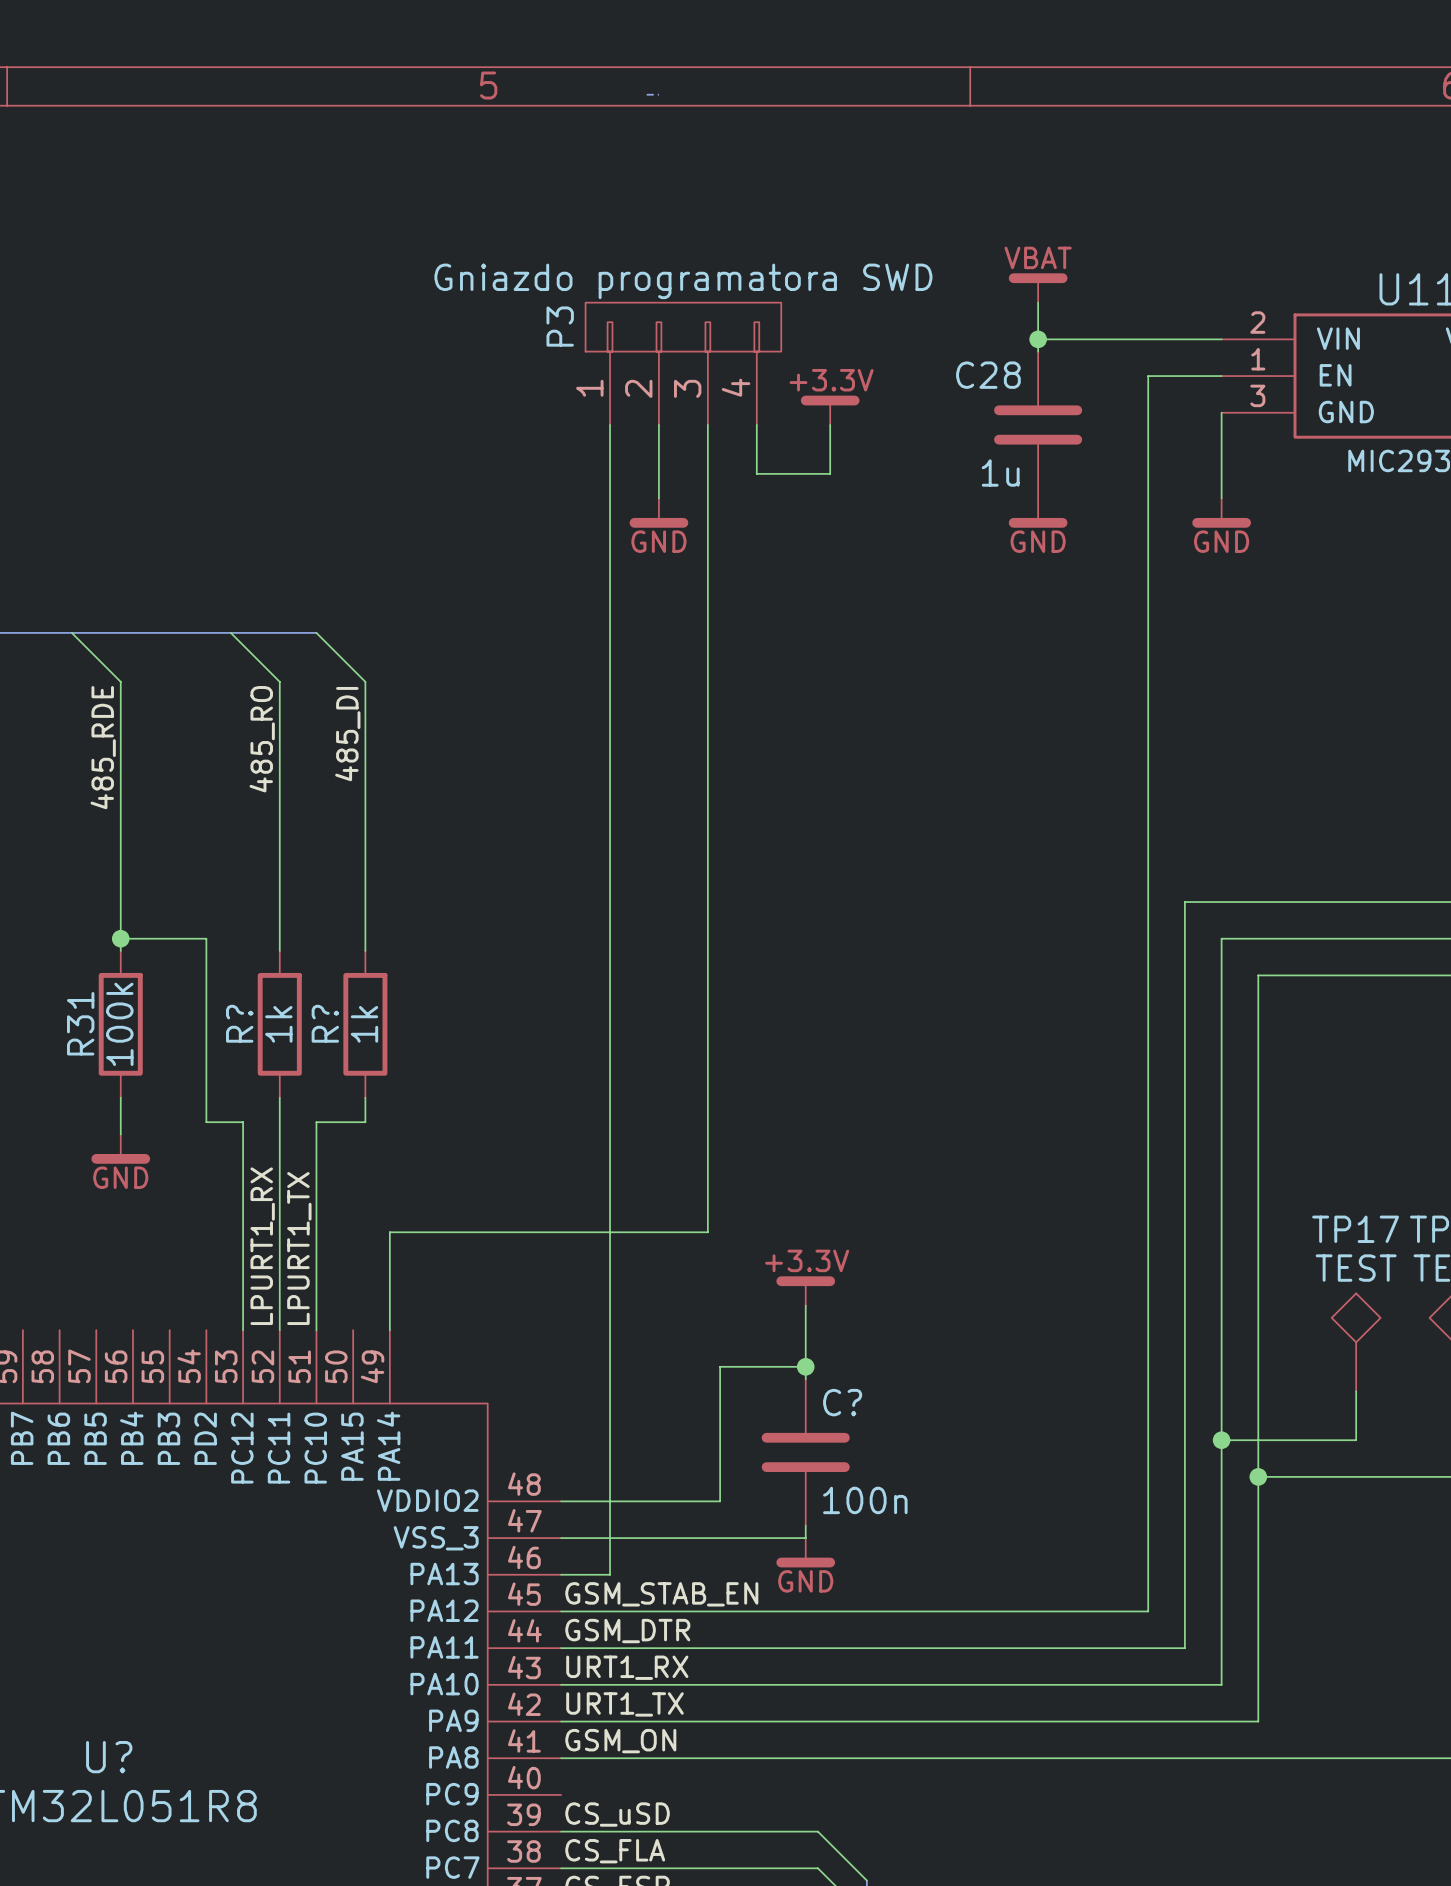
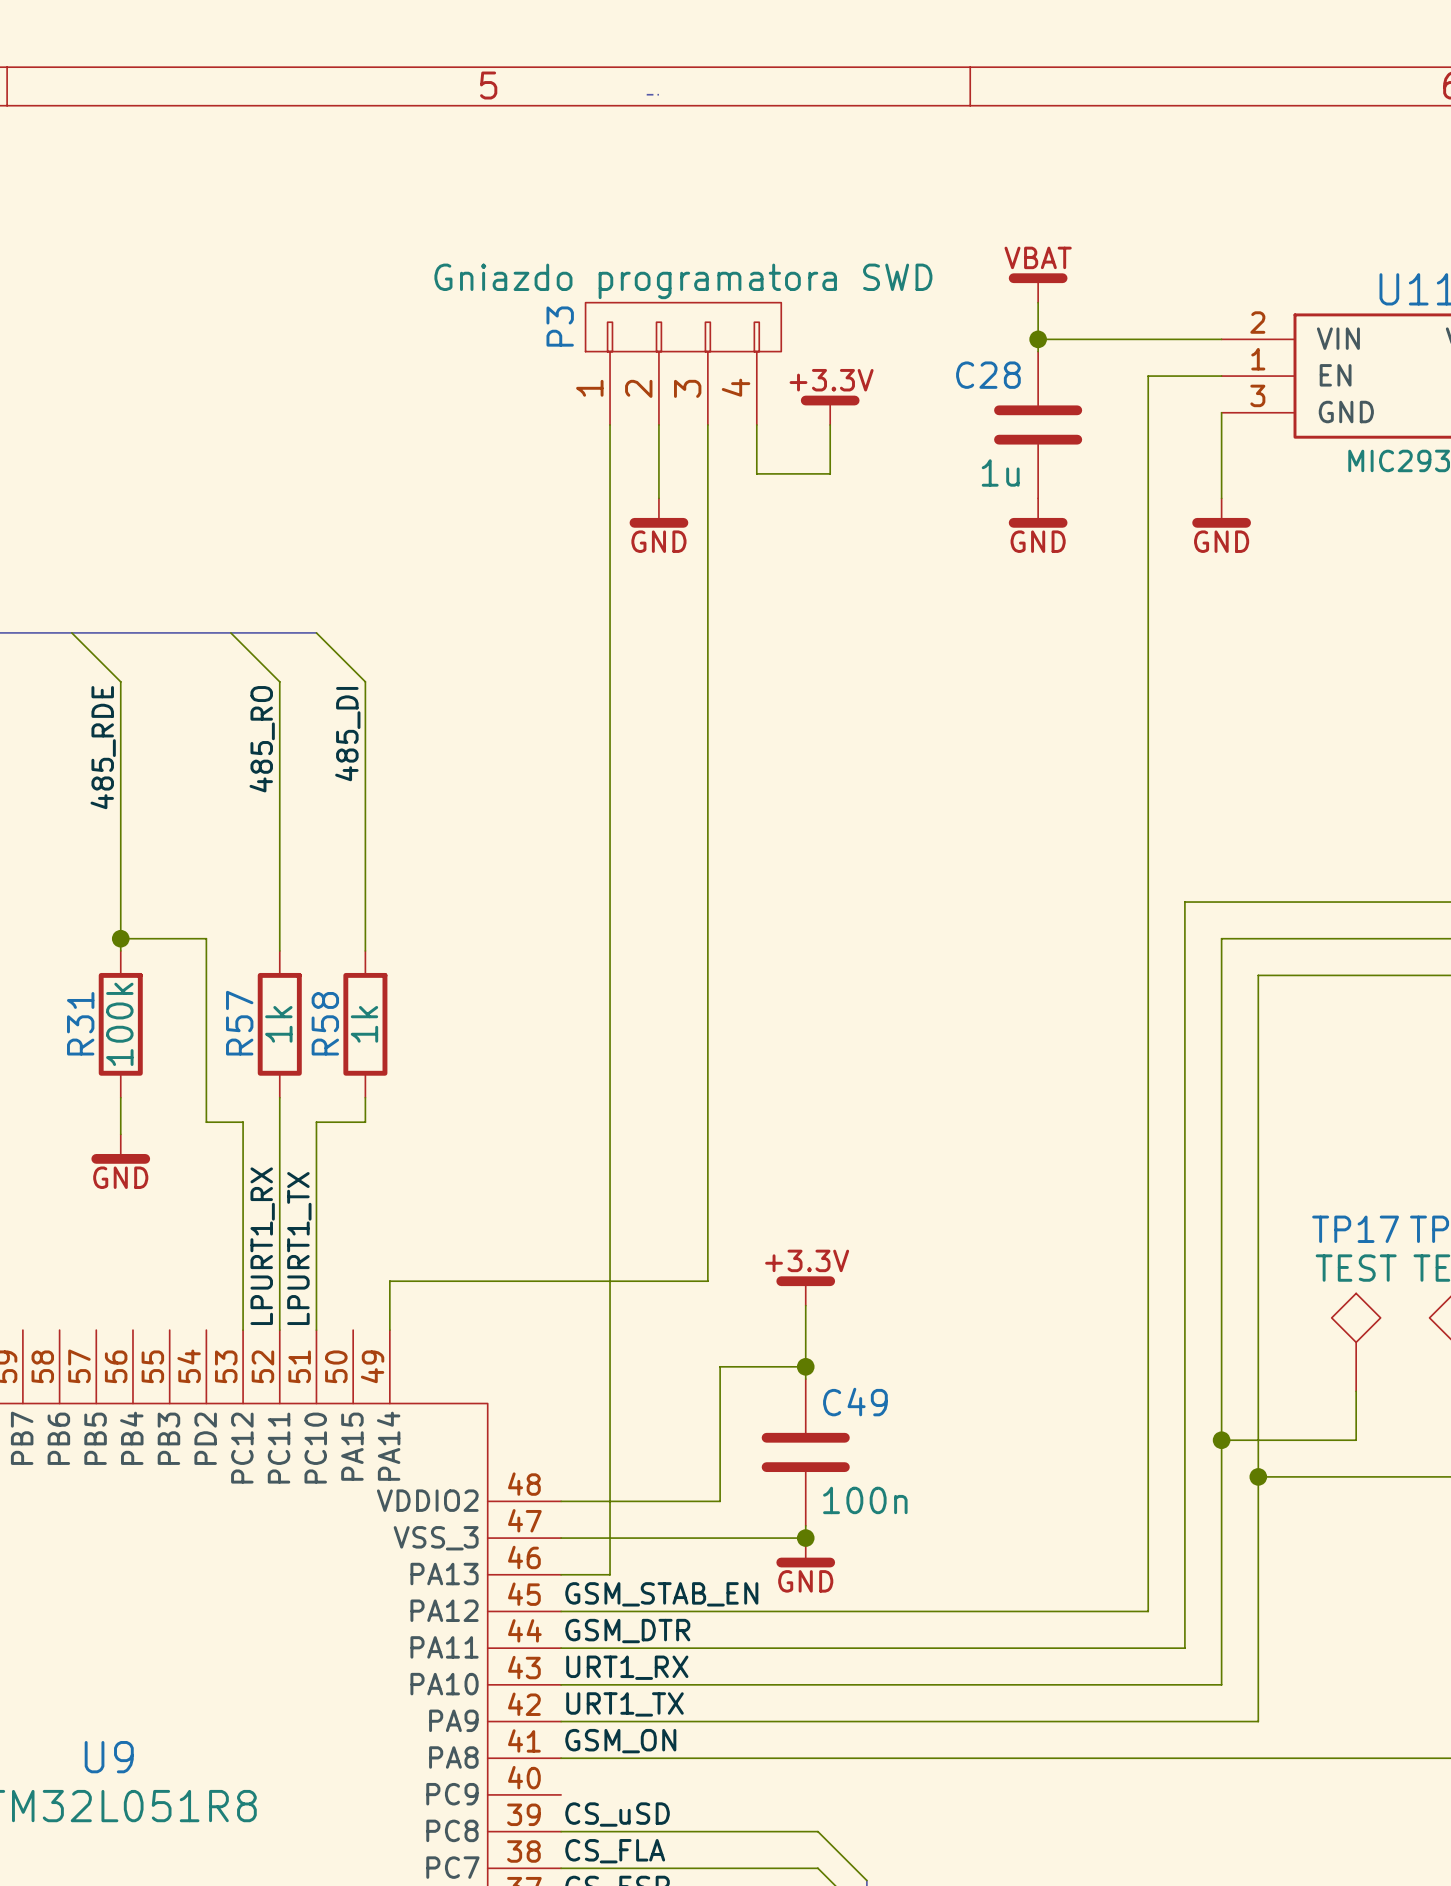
R? name: R? (239, 1023) -> R57 (239, 1023)
R? name: R? (325, 1023) -> R58 (325, 1023)
wire: (707, 1232) (389, 1232) (389, 1281) -> (707, 1232) (707, 1281) (389, 1281)
C? name: C? (842, 1402) -> C49 (855, 1402)
junction: none -> (805, 1538)
U? name: U? (109, 1757) -> U9 (109, 1757)

